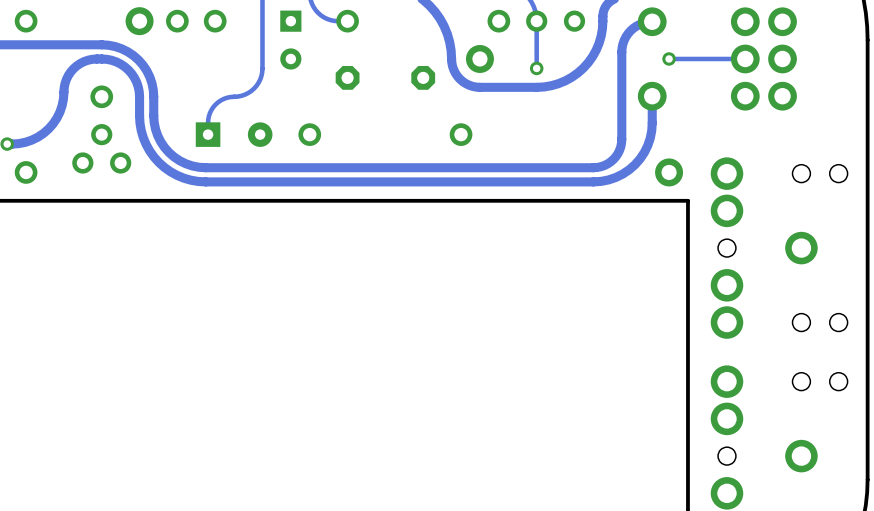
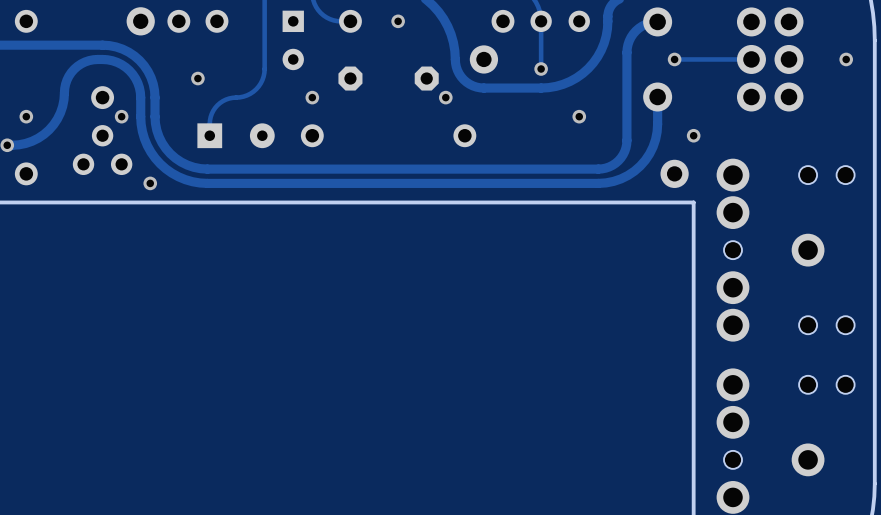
via: none -> (398, 21)
via: none -> (846, 59)
via: none -> (197, 78)
via: none -> (312, 97)
via: none -> (445, 97)
via: none -> (26, 116)
via: none -> (121, 116)
via: none -> (579, 116)
via: none -> (693, 135)
via: none -> (150, 183)

